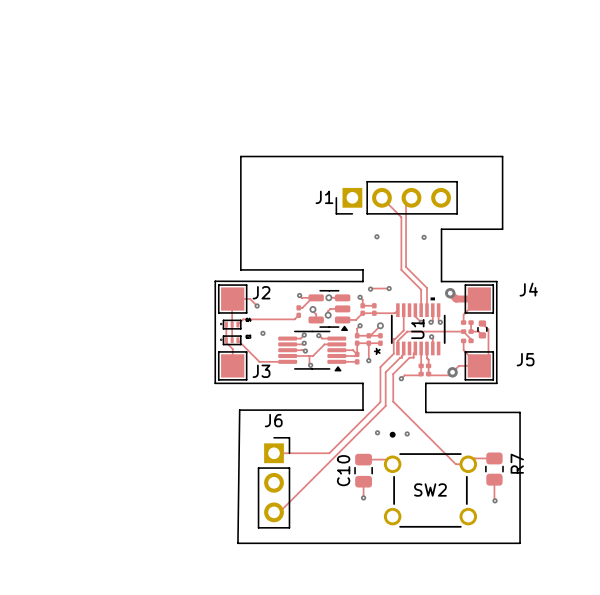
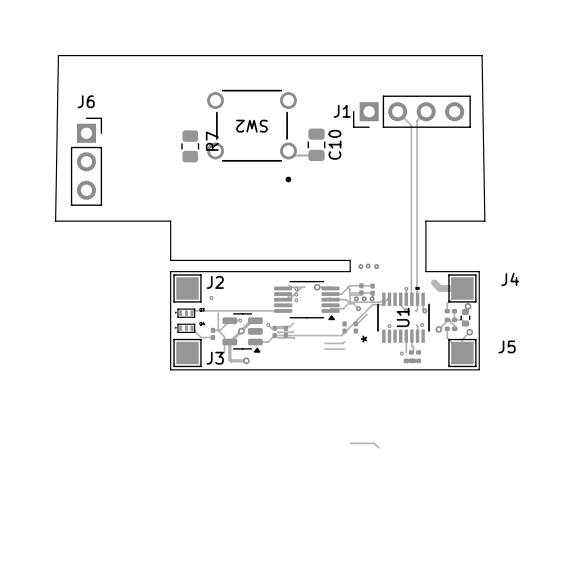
track: none -> (397, 111) (411, 125) (411, 297)
track: none -> (426, 111) (416, 120) (416, 297)
track: none -> (288, 150) (292, 155) (316, 155)
track: (381, 197) (401, 217) (401, 269) (421, 289) (421, 299) -> none
J1 position: (396, 197) -> (411, 111)
track: (411, 197) (406, 203) (406, 267) (426, 287) (426, 310) -> none
board edge: (502, 229) (502, 156) (240, 156) (240, 269) -> (484, 221) (482, 55) (58, 55) (55, 221) (170, 221) (170, 260) (232, 260)
via: (376, 236) -> none
via: (424, 237) -> none
via: none -> (368, 266)
via: none -> (360, 266)
via: none -> (376, 266)
board edge: (362, 281) (215, 281) (215, 383) -> (350, 271) (170, 271) (170, 369) (207, 369)
track: (389, 288) (370, 289) -> none
via: (389, 288) -> none
via: (370, 289) -> none
via: (450, 293) -> none
via: (299, 295) -> none
track: none -> (372, 286) (349, 285) (341, 294) (330, 294)
via: (360, 297) -> none
J2 position: (232, 299) -> (187, 288)
via: none -> (296, 289)
part: none -> (361, 289)
via: none -> (406, 289)
part: none -> (372, 289)
track: (257, 305) (250, 299) (232, 299) (232, 340) -> none
via: (257, 305) -> none
via: none -> (296, 294)
via: none -> (211, 298)
track: (342, 308) (330, 308) (328, 315) -> none
track: none -> (388, 297) (382, 304) (372, 304) (341, 335) (274, 335) (268, 342) (255, 342)
track: (312, 309) (316, 314) (316, 319) -> none
via: (312, 309) -> none
part: (362, 309) -> none
via: none -> (356, 298)
part: (374, 309) -> none
via: none -> (364, 298)
track: none -> (372, 298) (372, 292) (350, 292) (350, 303)
via: none -> (372, 298)
part position: (329, 310) -> (242, 332)
track: none -> (330, 299) (346, 299) (350, 303)
track: (403, 310) (403, 330) (393, 339) (393, 353) (380, 367) (380, 402) (329, 453) (274, 453) -> none
part: (298, 311) -> none
via: none -> (296, 300)
track: none -> (350, 303) (353, 303) (358, 308)
track: (298, 315) (294, 319) (243, 319) (237, 324) -> none
via: (328, 315) -> none
via: none -> (468, 306)
via: none -> (358, 308)
track: none -> (283, 310) (194, 310) (191, 313)
via: (431, 322) -> none
track: (482, 323) (488, 329) (488, 356) (479, 365) (458, 365) (449, 375) (428, 375) (428, 366) -> none
part position: (230, 324) -> (185, 328)
track: (360, 325) (357, 328) (357, 335) (380, 335) -> none
via: (360, 325) -> none
via: (380, 325) -> none
track: none -> (240, 320) (230, 320) (220, 330) (213, 330)
via: none -> (240, 320)
track: none -> (255, 320) (251, 320) (229, 342) (229, 359) (246, 360)
via: (262, 333) -> none
via: (304, 335) -> none
track: (318, 335) (322, 338) (336, 338) -> none
via: (318, 335) -> none
track: none -> (268, 324) (271, 328) (285, 328)
via: none -> (268, 324)
via: (431, 336) -> none
via: none -> (422, 324)
via: none -> (389, 326)
part: (380, 339) -> none
track: none -> (191, 328) (201, 337) (213, 337)
part position: (230, 340) -> (185, 313)
track: (237, 340) (259, 361) (287, 361) -> none
track: (471, 340) (463, 331) (407, 331) (397, 340) (397, 349) -> none
track: none -> (457, 328) (448, 319) (438, 329)
via: none -> (438, 329)
via: none -> (241, 331)
via: (304, 343) -> none
track: (368, 343) (368, 360) -> none
track: (380, 343) (357, 343) (357, 354) (352, 350) (336, 350) -> none
part: none -> (274, 331)
part: none -> (285, 331)
track: (336, 344) (324, 344) (312, 356) (287, 356) -> none
track: none -> (469, 332) (462, 339) (462, 352)
via: none -> (469, 332)
part: none -> (213, 333)
track: (403, 348) (402, 357) (385, 372) (385, 406) (279, 512) (274, 512) -> none
track: (415, 348) (413, 357) (409, 357) (393, 374) (393, 401) (455, 464) (468, 464) (474, 458) (494, 458) -> none
via: (305, 351) -> none
part position: (312, 351) -> (306, 300)
track: (309, 356) (310, 365) -> none
part: (357, 358) -> none
via: (368, 360) -> none
J3 position: (232, 365) -> (187, 352)
via: (310, 365) -> none
part: (424, 365) -> none
part: none -> (414, 352)
via: none -> (401, 353)
track: (421, 366) (421, 375) (404, 375) (401, 378) -> none
via: (452, 372) -> none
via: none -> (246, 360)
part: none -> (414, 360)
via: (401, 378) -> none
board edge: (362, 383) (362, 410) (239, 410) (237, 543) (520, 543) (520, 412) (425, 412) (425, 383) -> (350, 369) (410, 369)
via: (377, 432) -> none
via: (407, 433) -> none
R7 position: (494, 469) -> (190, 146)
C10 name position: C10 (343, 470) -> C10 (334, 144)
C10 position: (363, 470) -> (316, 144)
SW2 rotation: 0° (430, 479) -> 180° (251, 136)
SW2 position: (430, 479) -> (251, 136)
track: (494, 479) (495, 500) -> none
track: (363, 481) (363, 497) -> none
J6 position: (274, 482) -> (86, 161)
via: (363, 497) -> none
via: (495, 500) -> none

